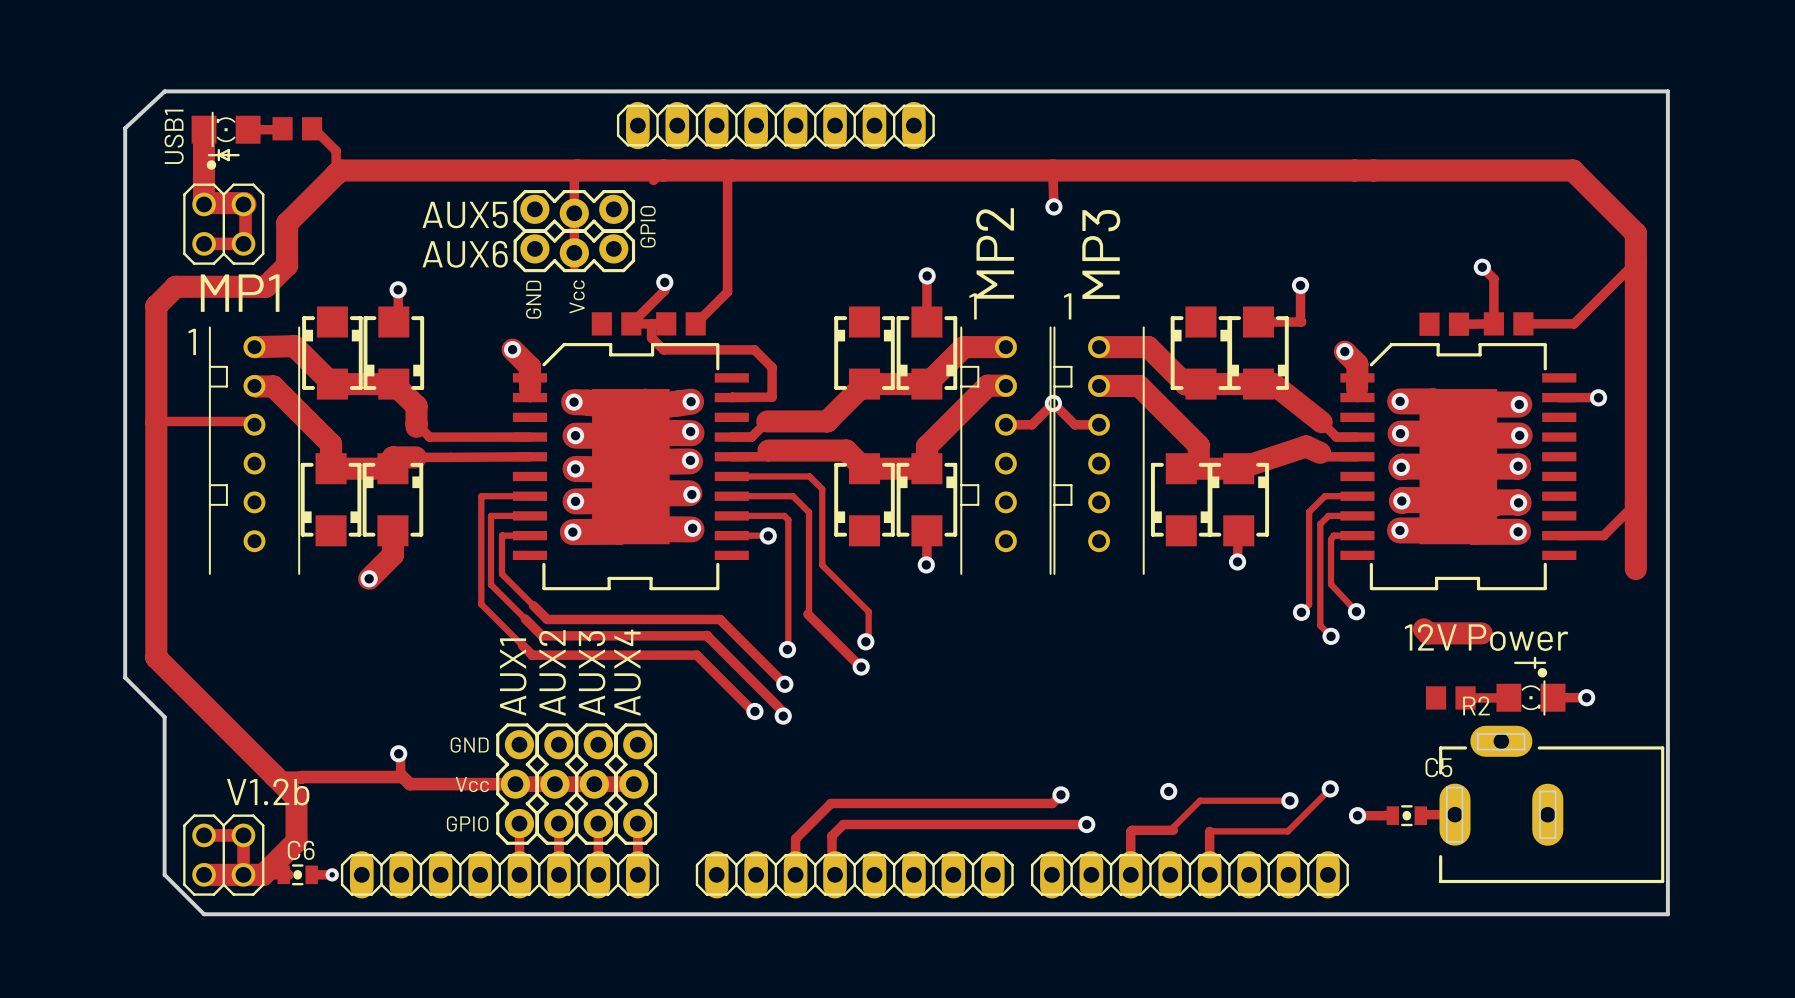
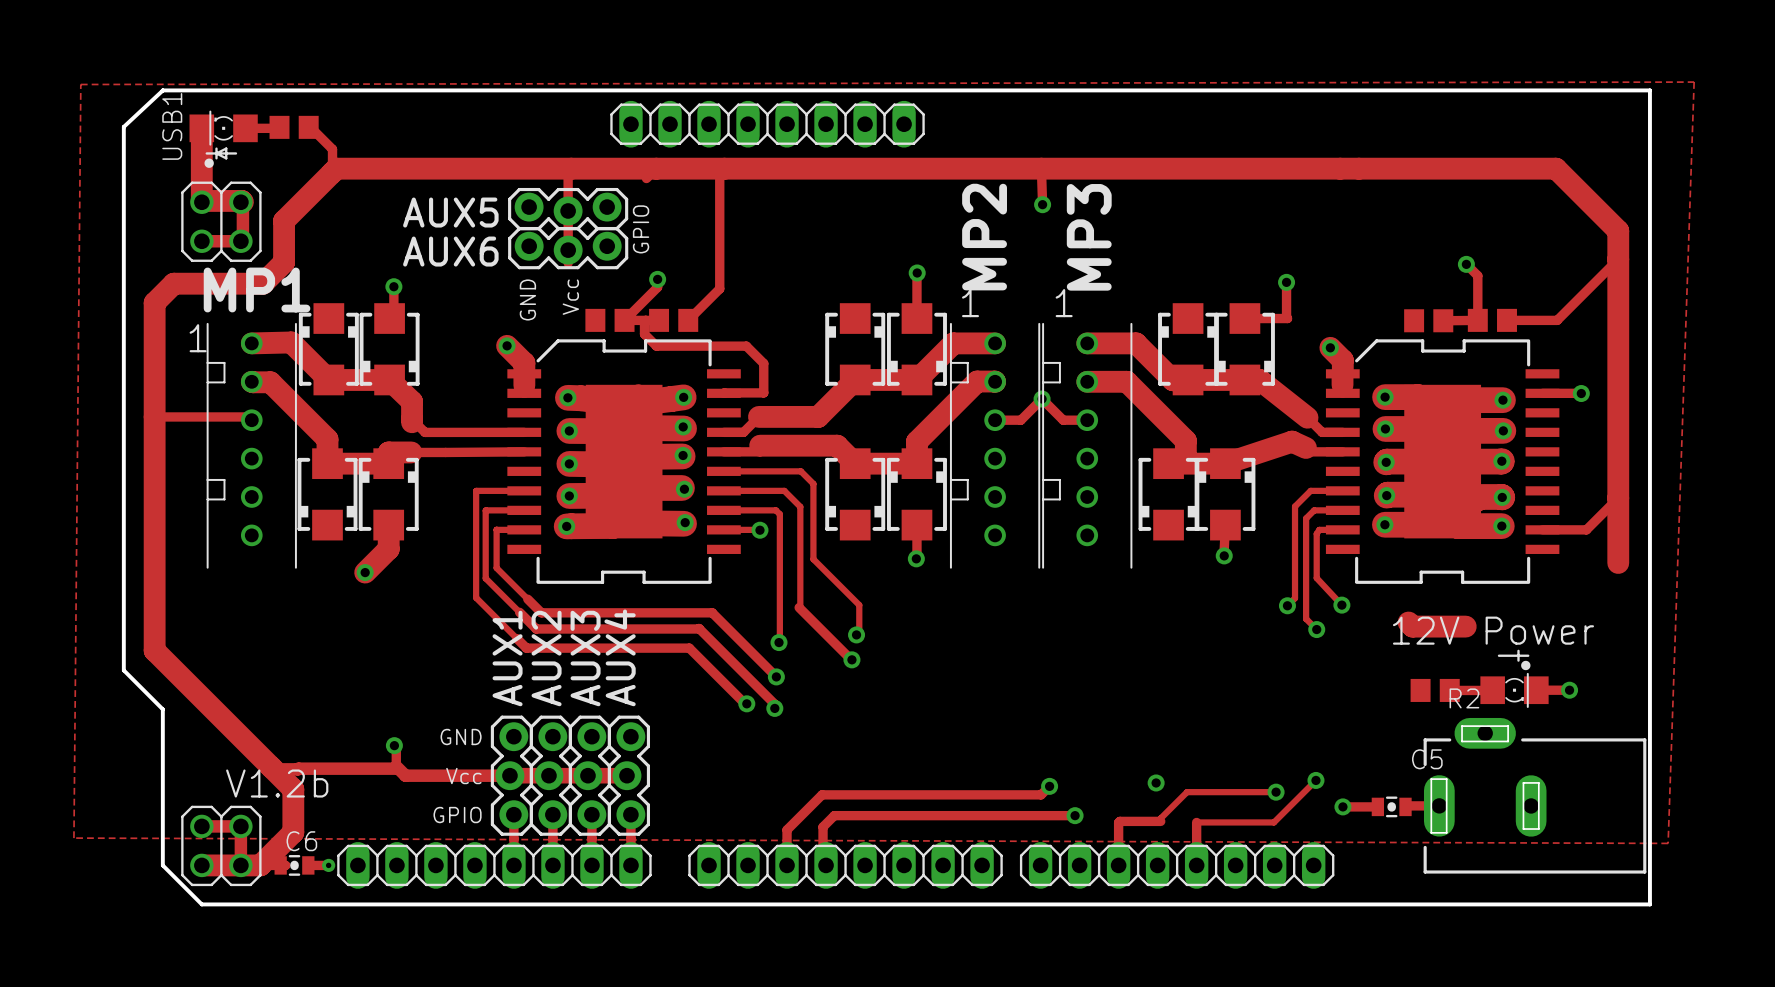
zone outline: none -> (1694, 82) (80, 84) (73, 838) (1668, 843) (1694, 82)

